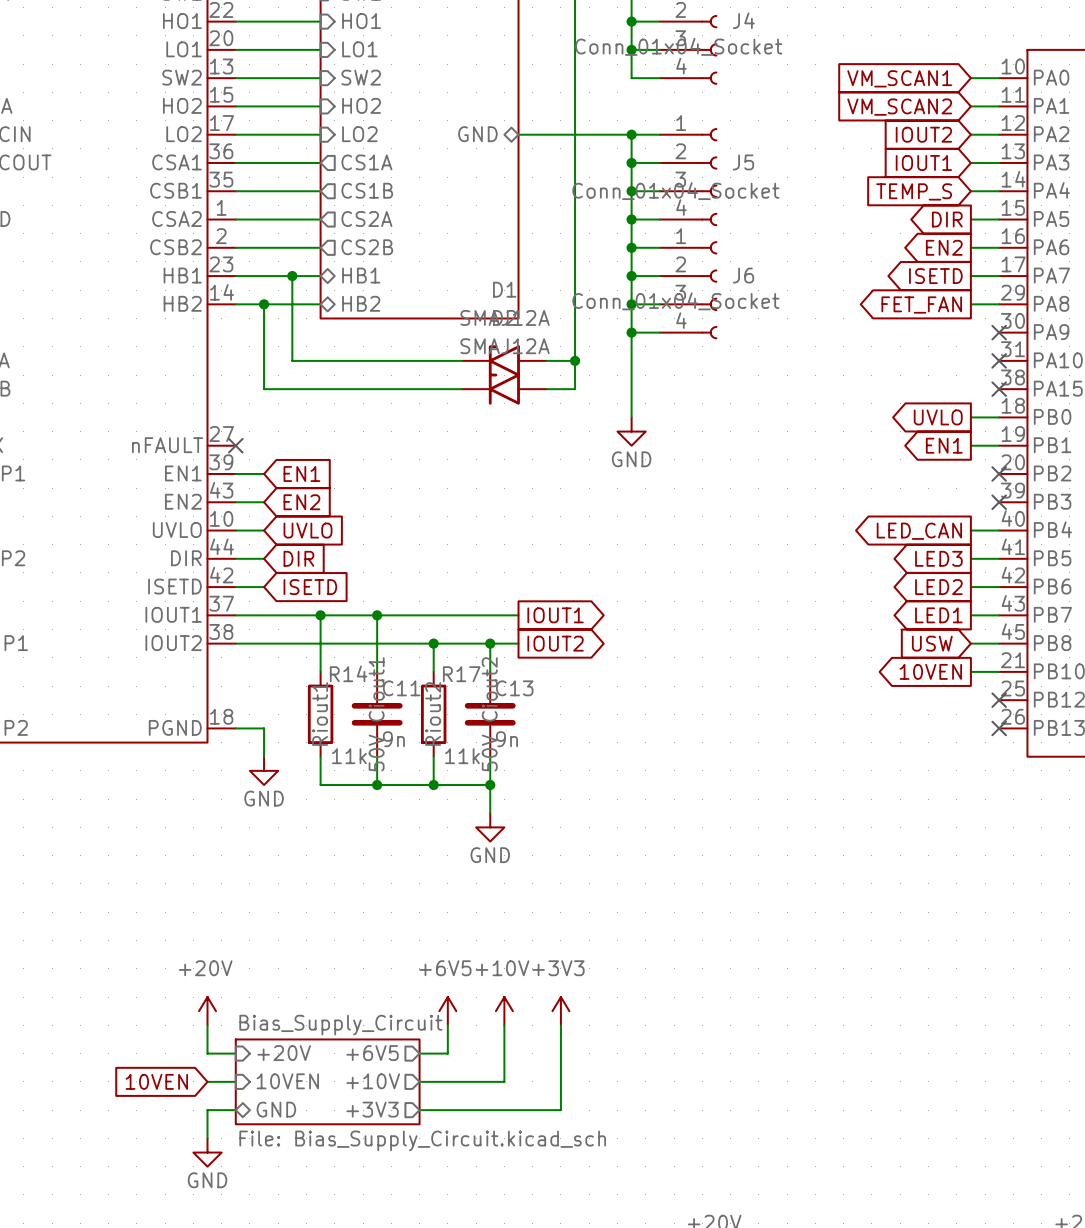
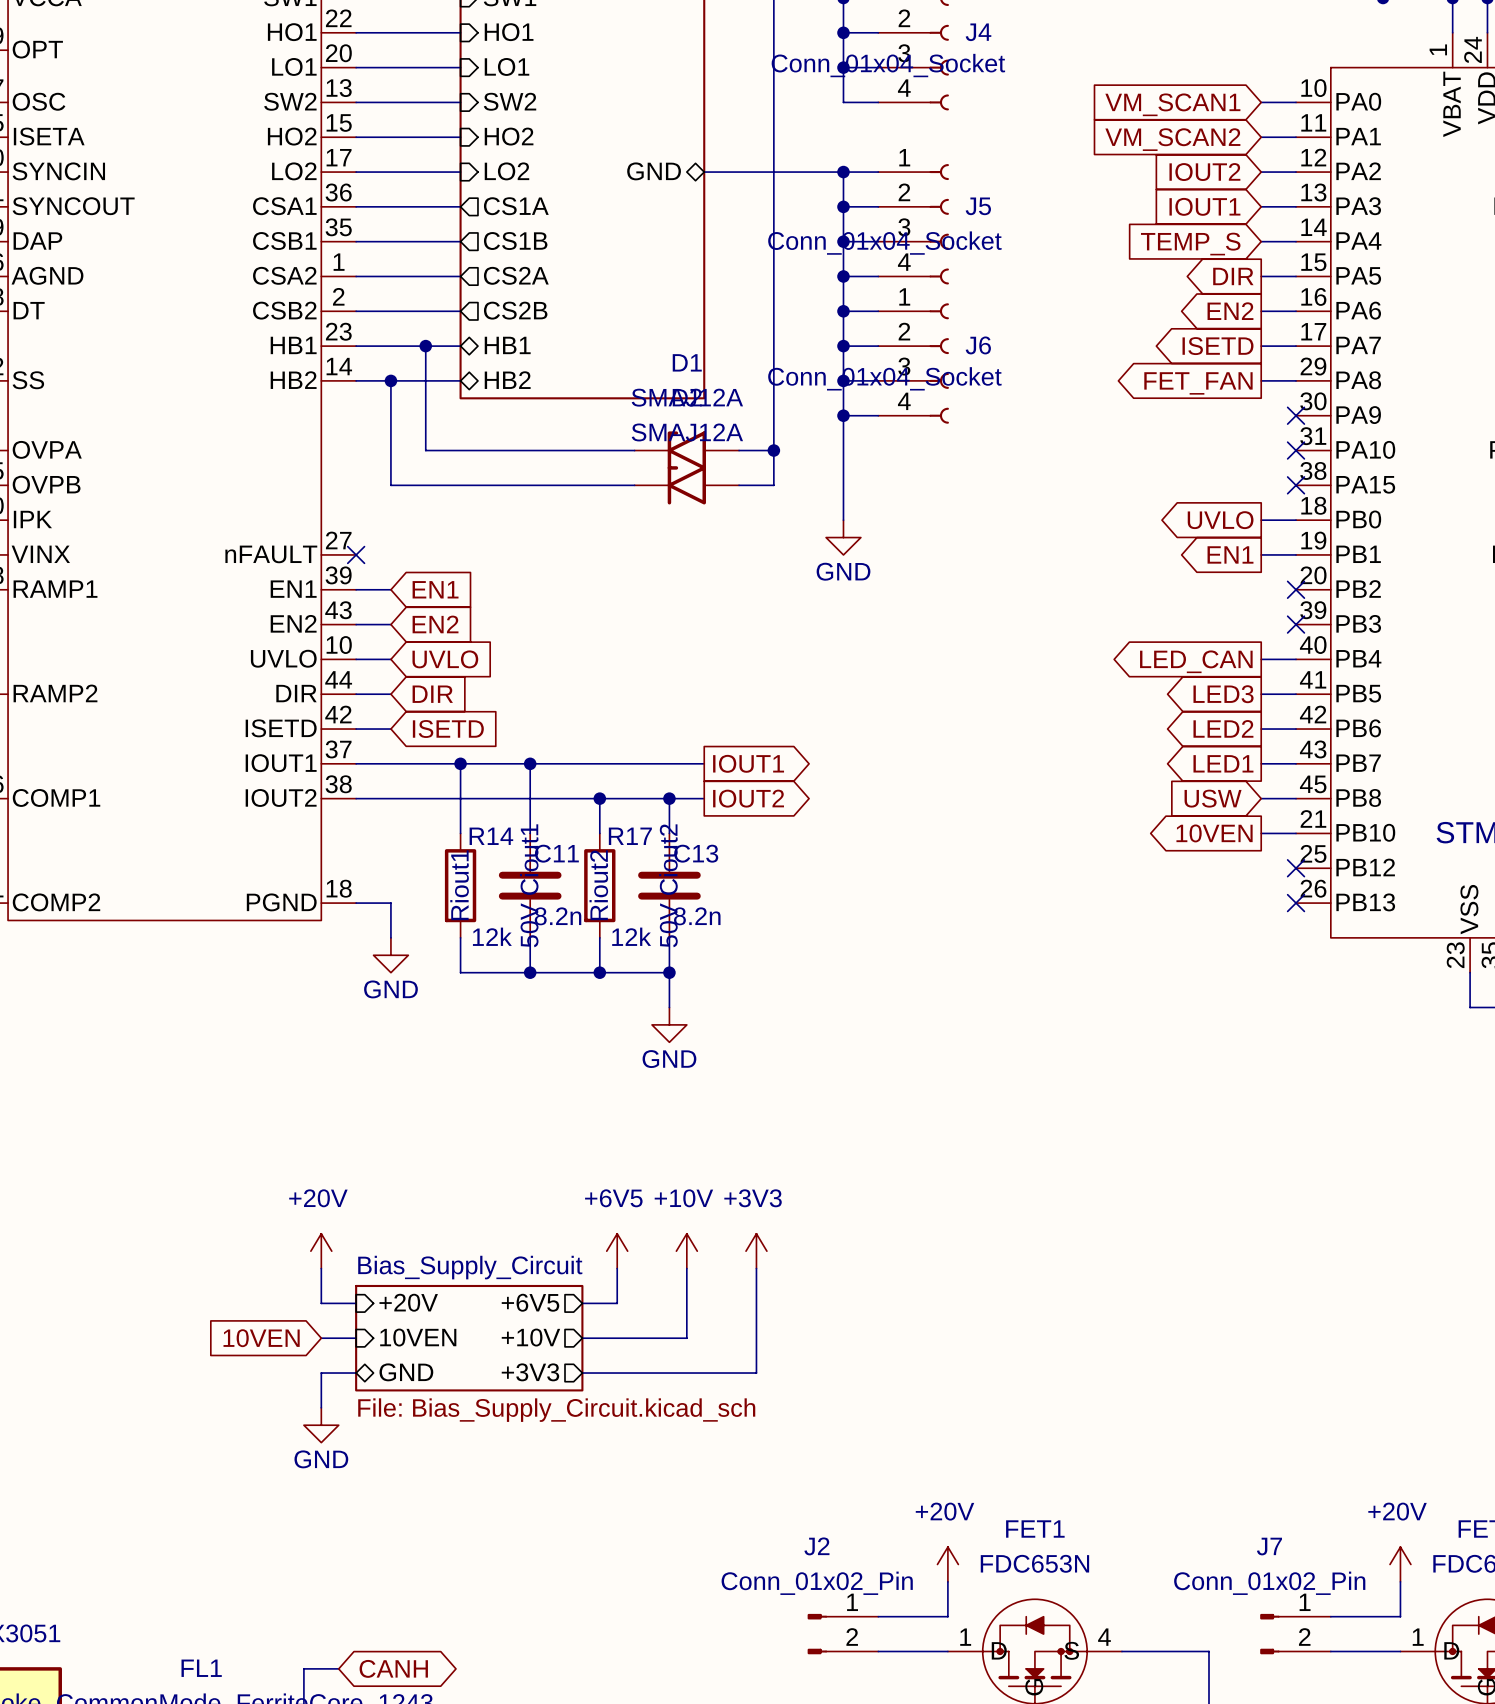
C11 value: 9n (393, 739) -> 8.2n (558, 916)
C13 value: 9n (506, 739) -> 8.2n (697, 916)
R14 value: 11k (349, 756) -> 12k (492, 936)
R17 value: 11k (462, 756) -> 12k (631, 936)

